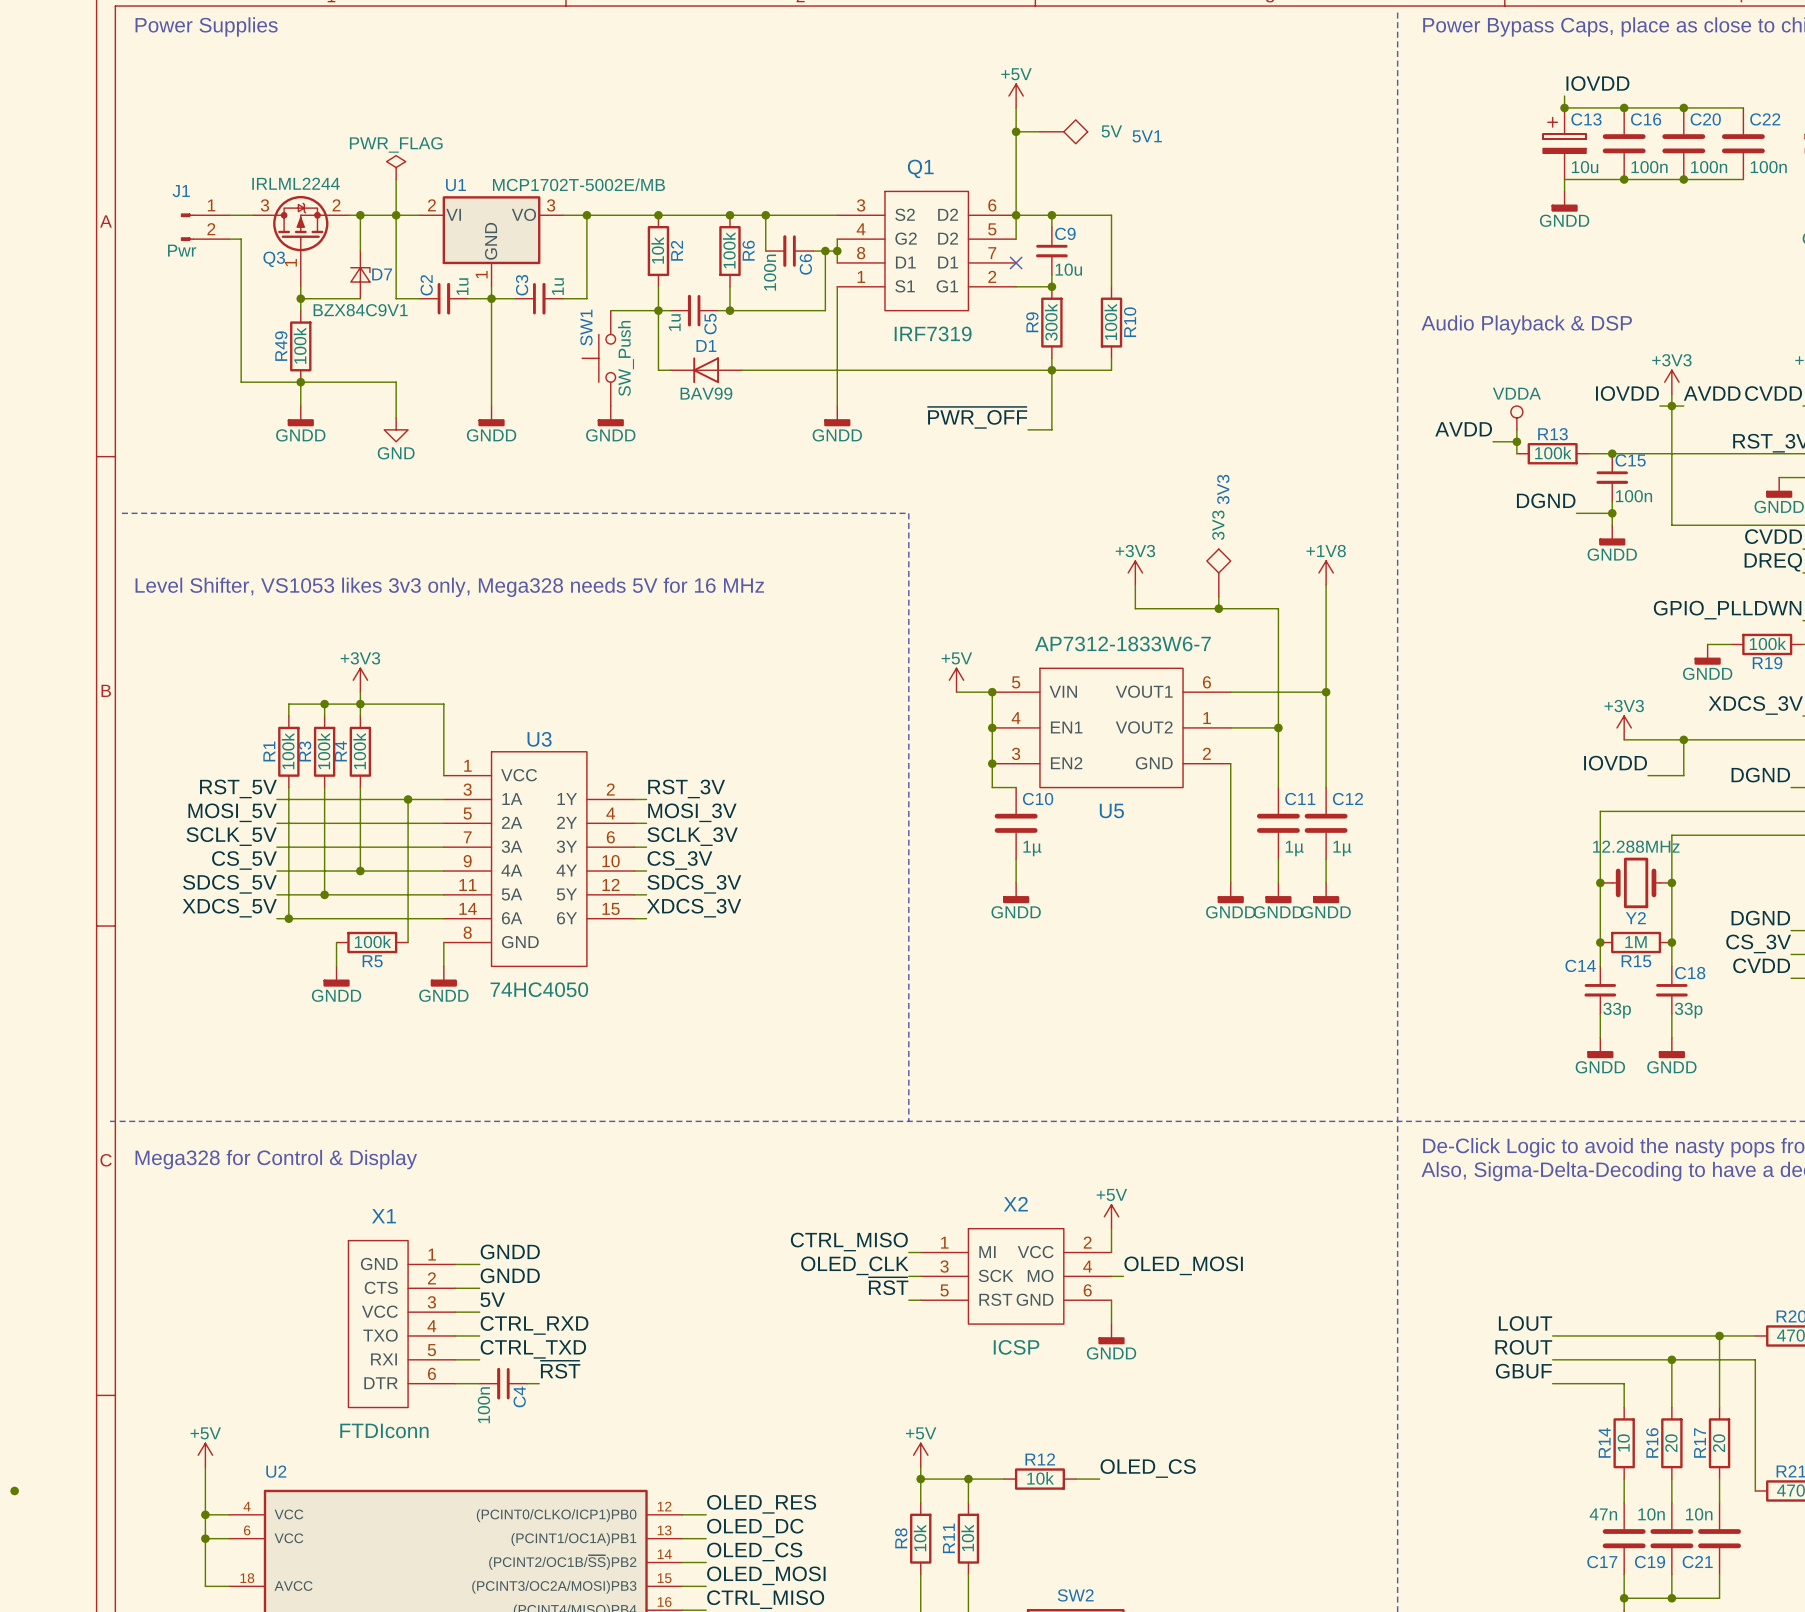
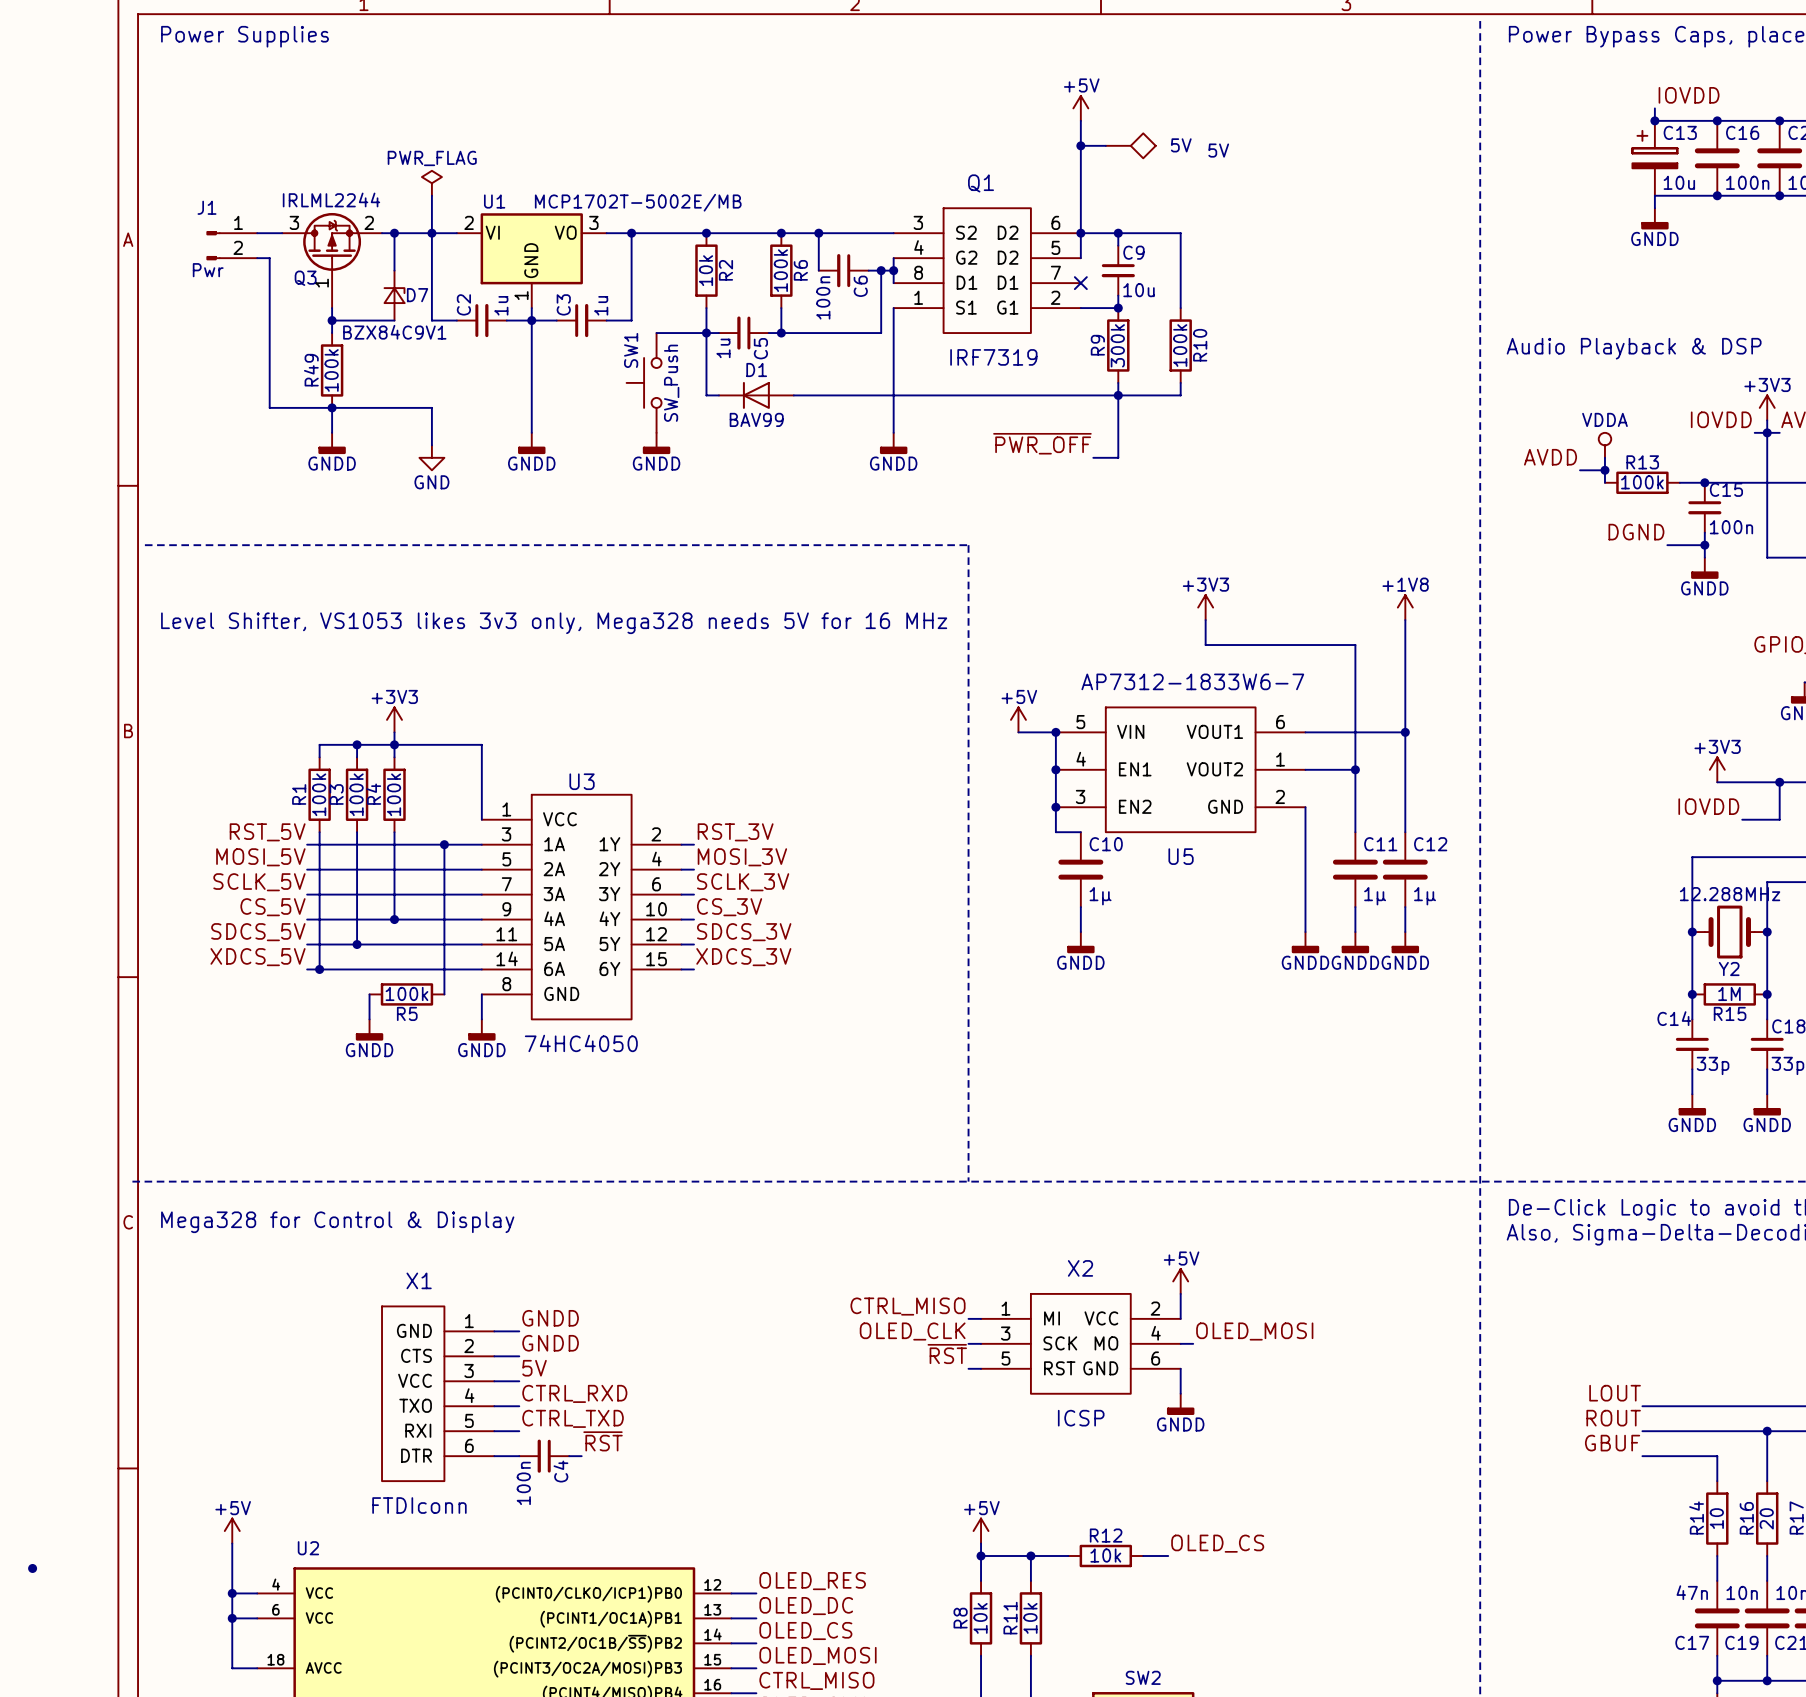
5V1 name: 5V1 (1147, 136) -> 5V (1218, 150)
3V3: 3V3 (1218, 572) -> none
wire: (1218, 596) (1218, 608) -> none
junction: (1218, 608) -> none

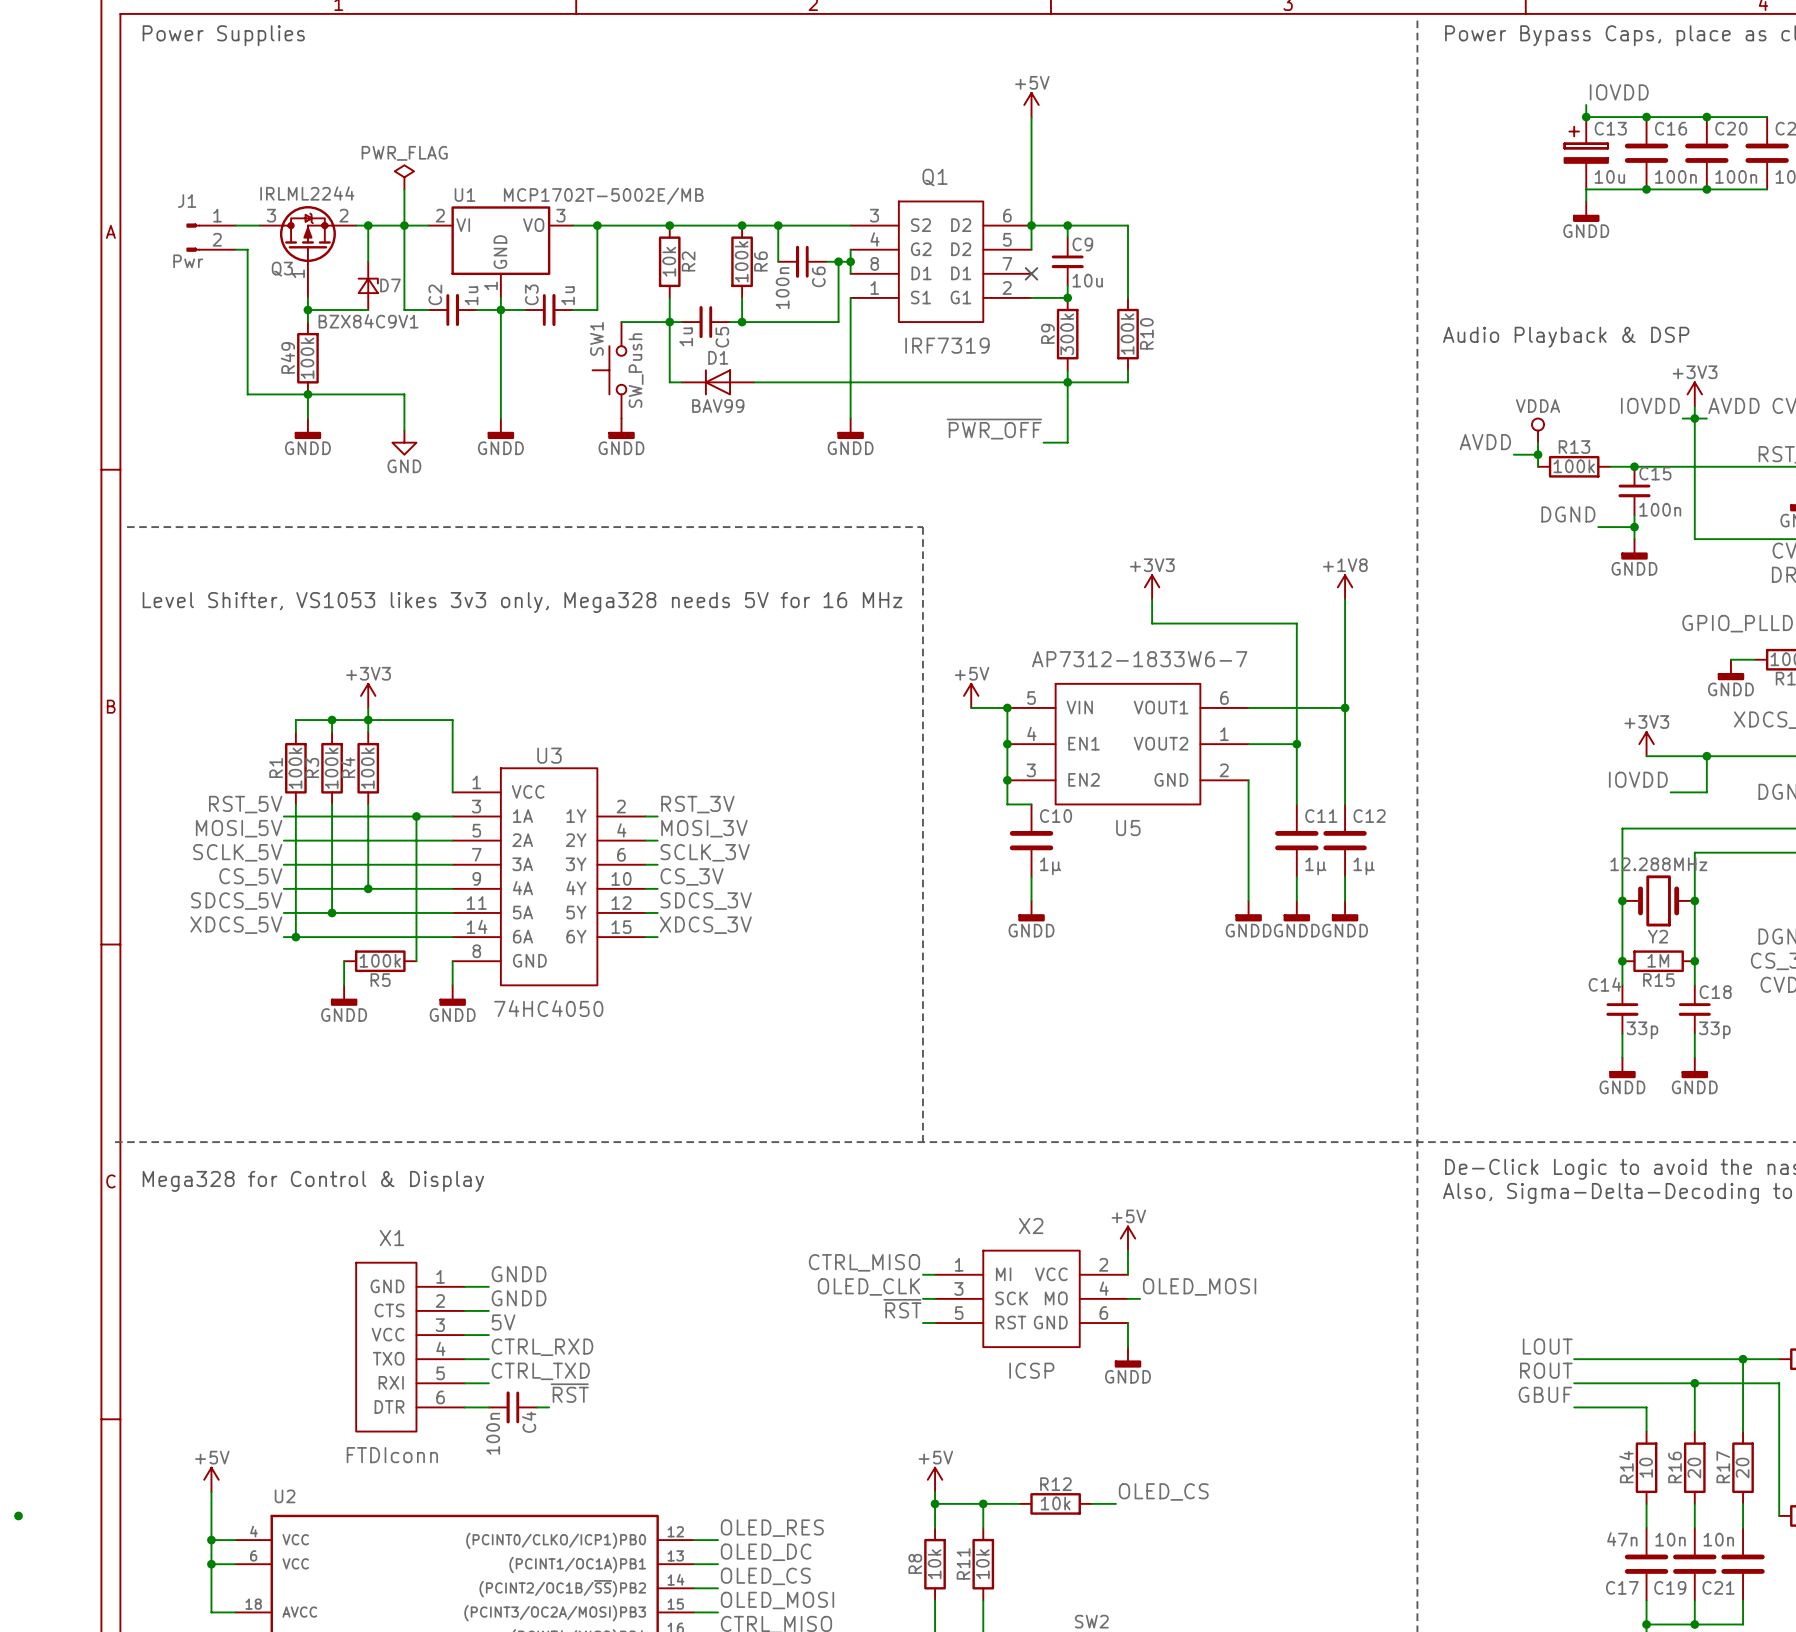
wire: (1080, 145) (1105, 145) -> none
junction: (1080, 145) -> none
5V: 5V (1130, 145) -> none

